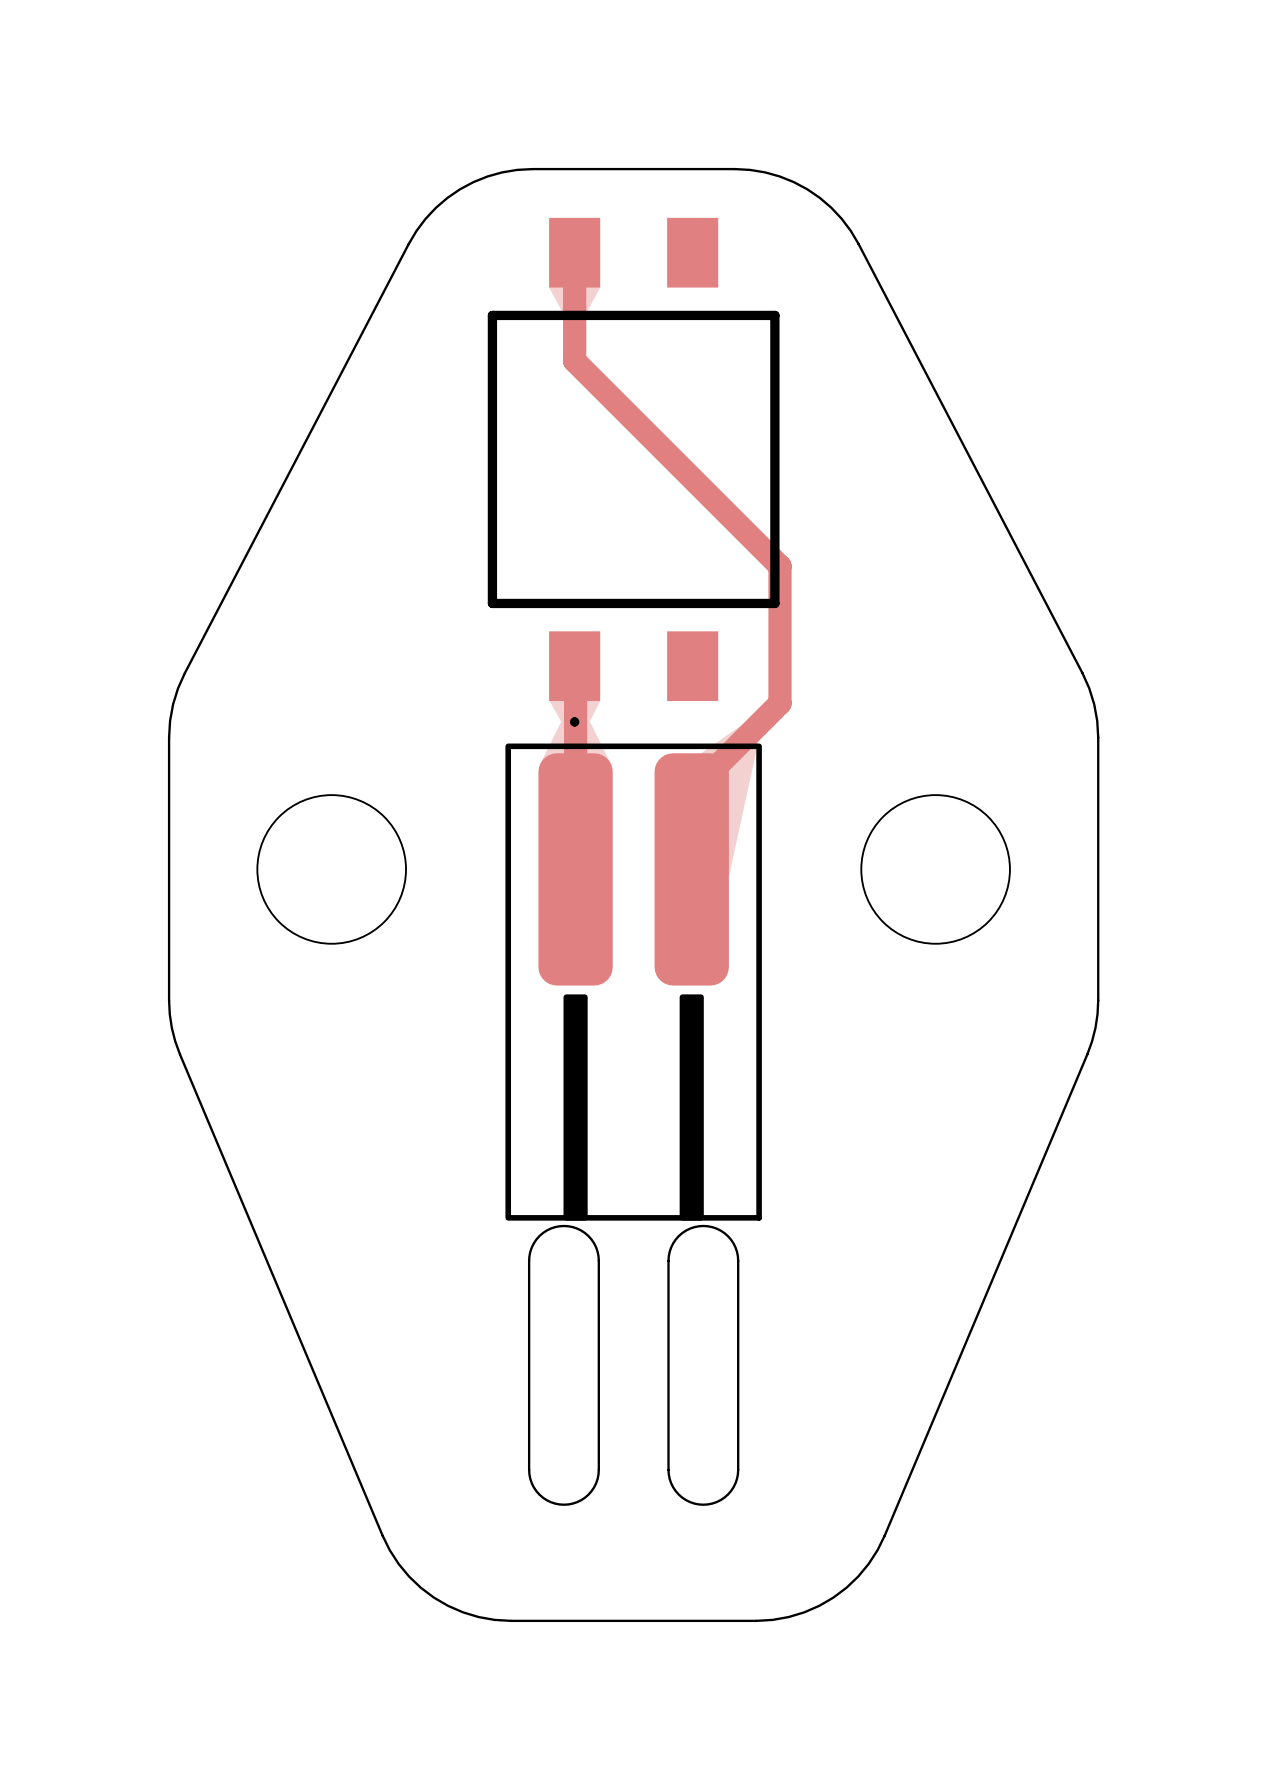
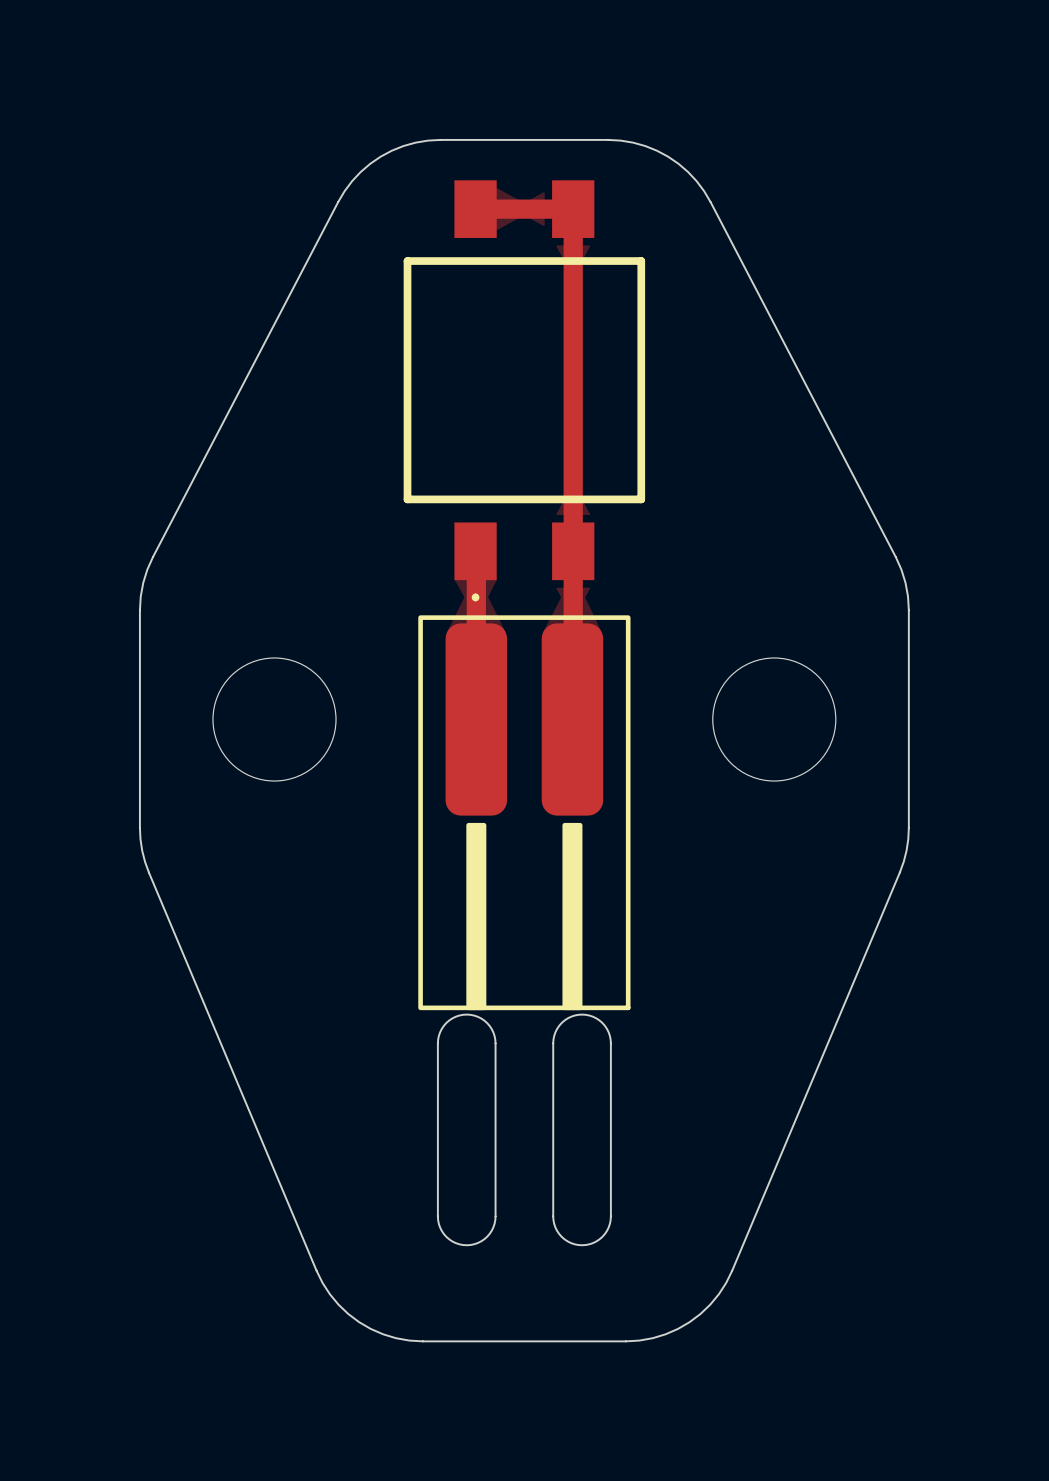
track: (574, 252) (574, 360) (780, 566) (780, 703) (691, 791) (691, 869) -> (475, 209) (573, 209) (573, 718)

